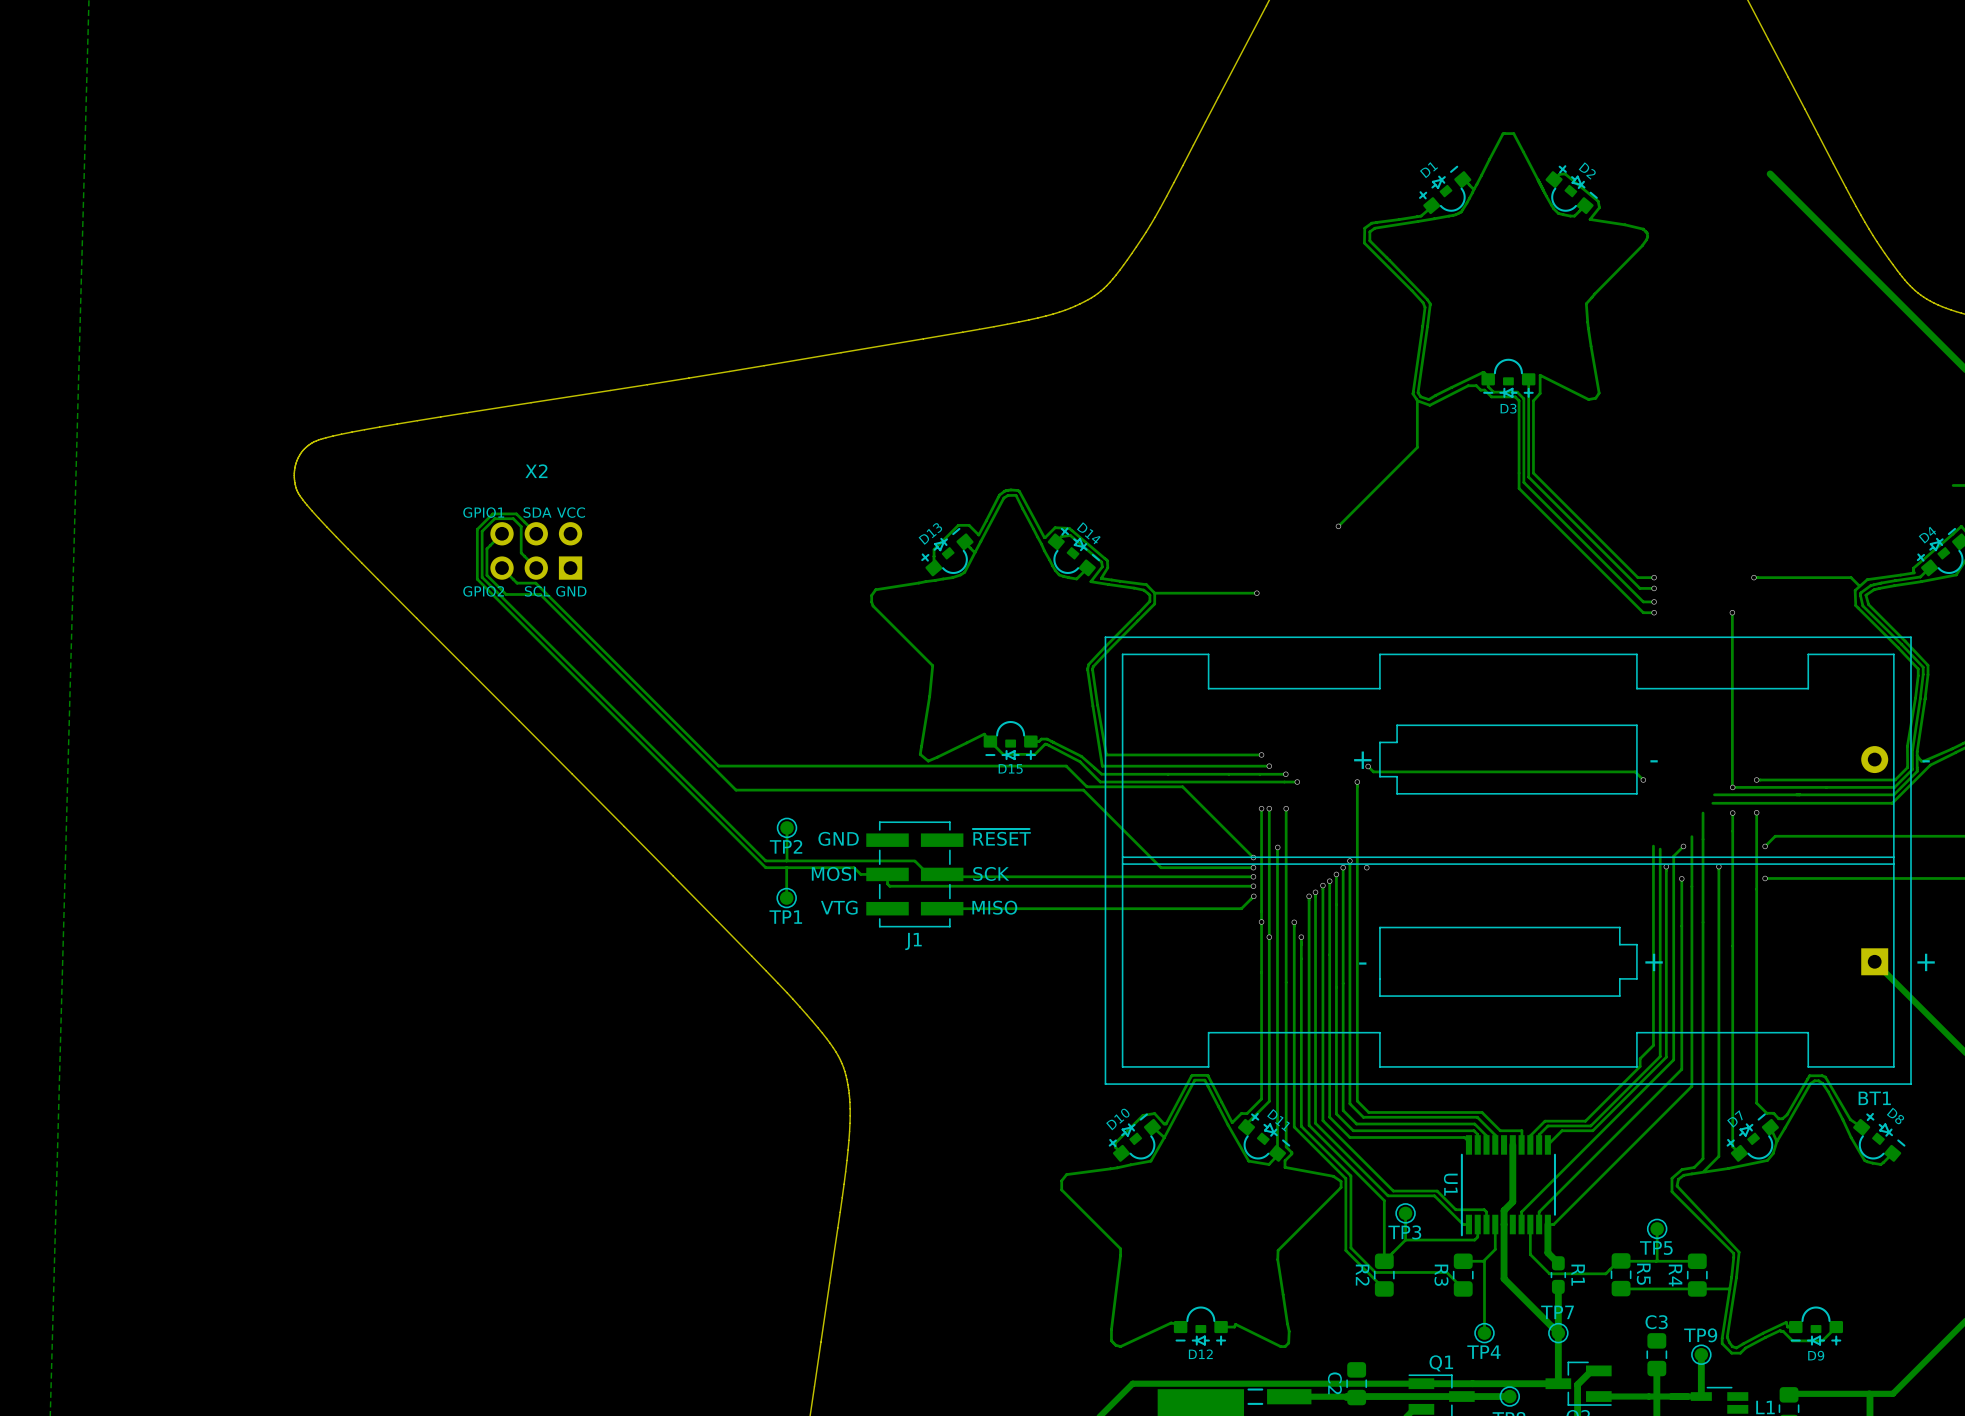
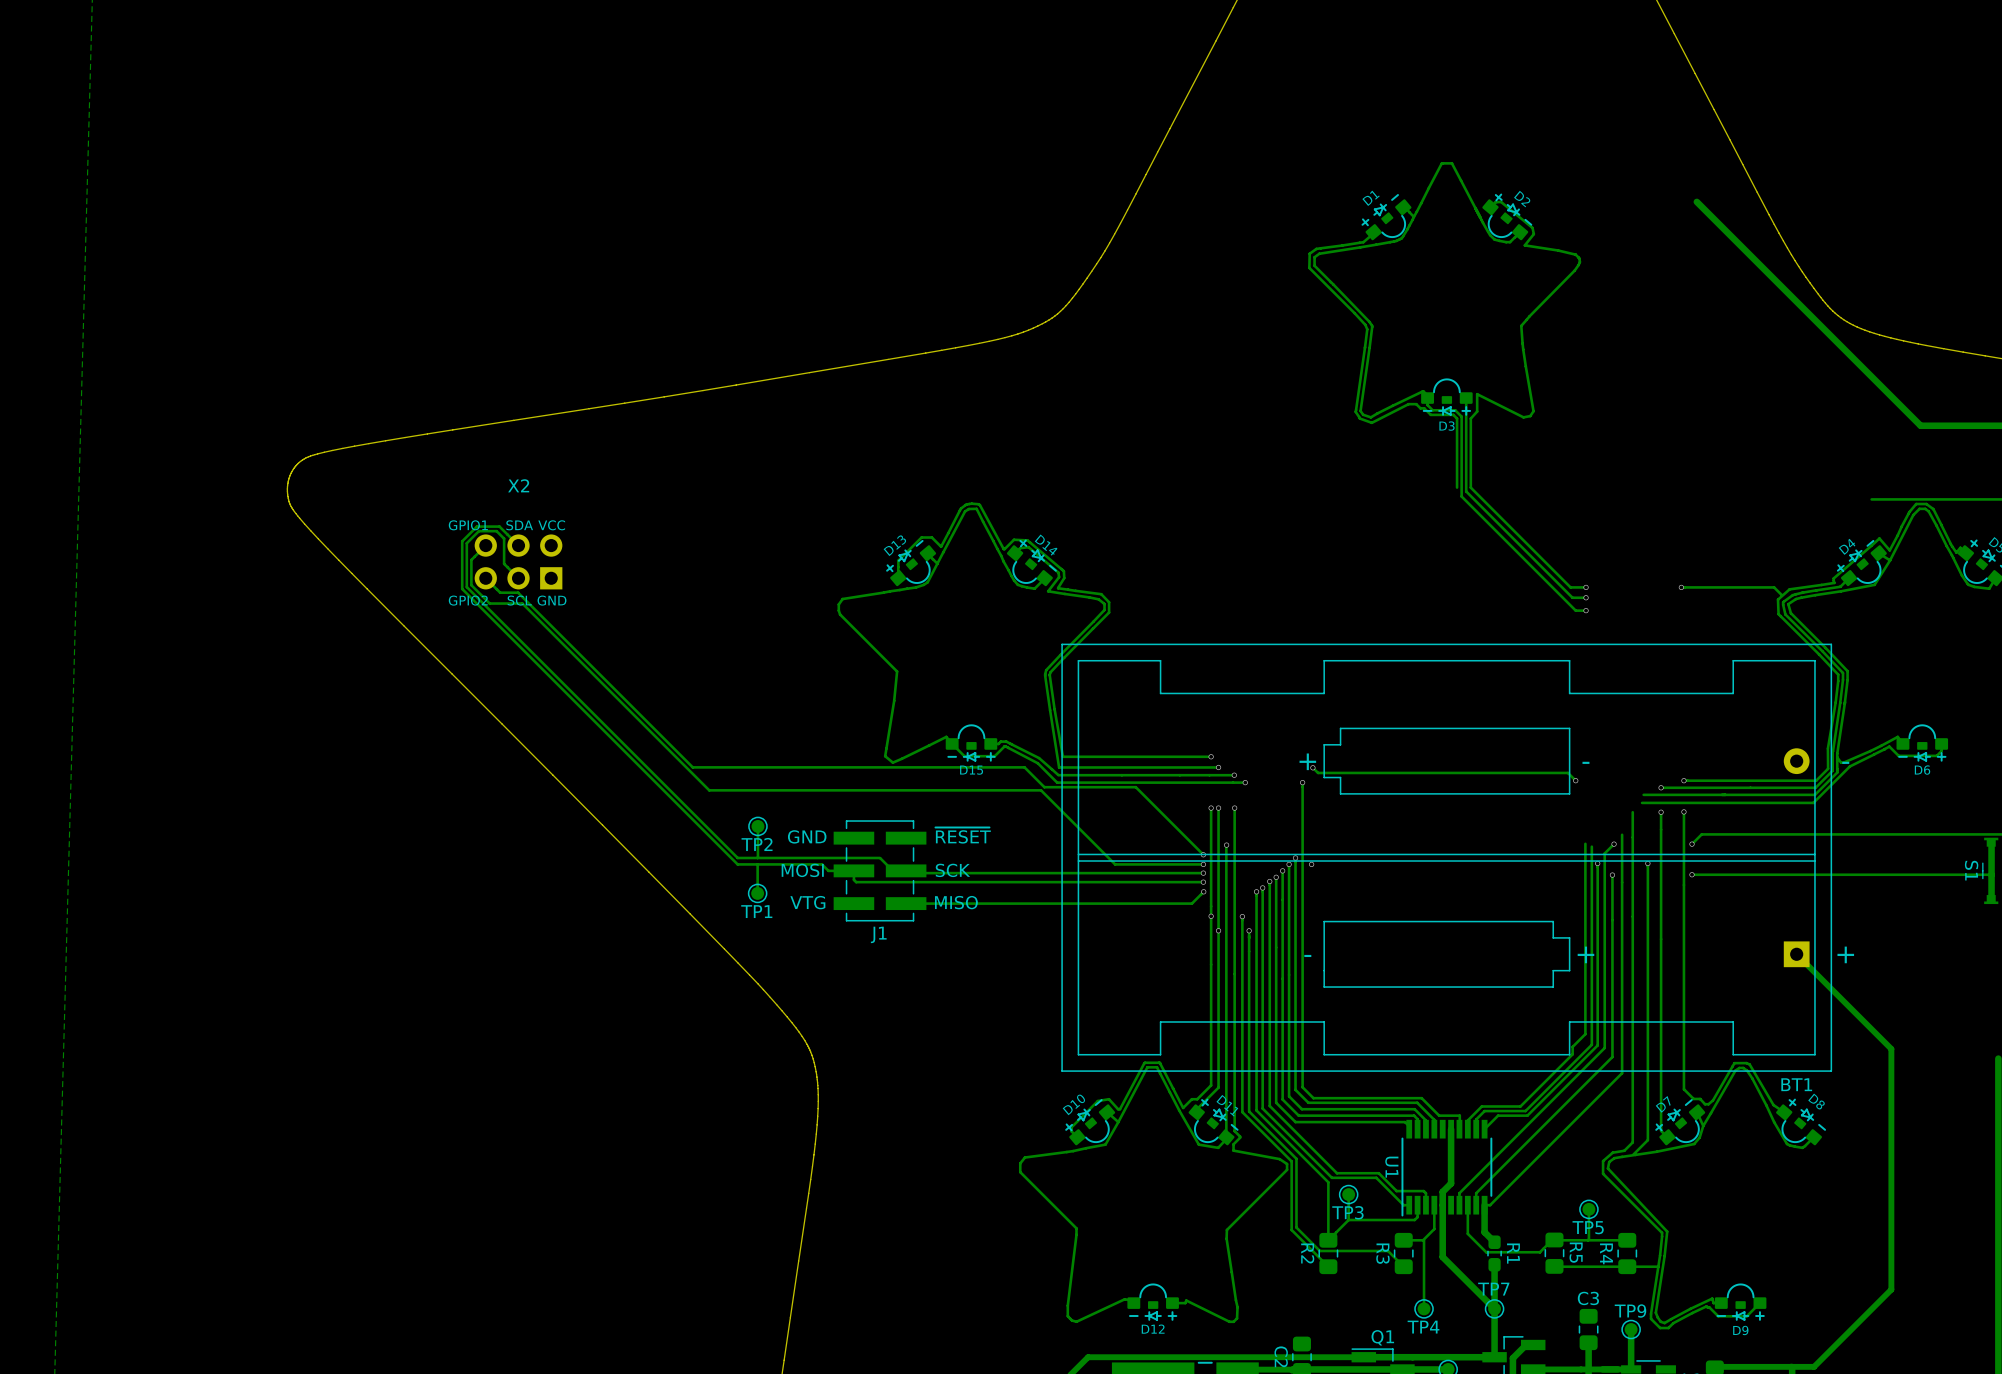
track: (1417, 400) (1417, 447) (1338, 526) -> none
track: (1519, 473) (1519, 488) (1643, 612) (1654, 612) -> none
via: (1338, 526) -> none
track: (1256, 593) (1154, 593) -> none
via: (1256, 593) -> none
via: (1654, 612) -> none
track: (1732, 612) (1732, 787) -> none
via: (1732, 612) -> none

